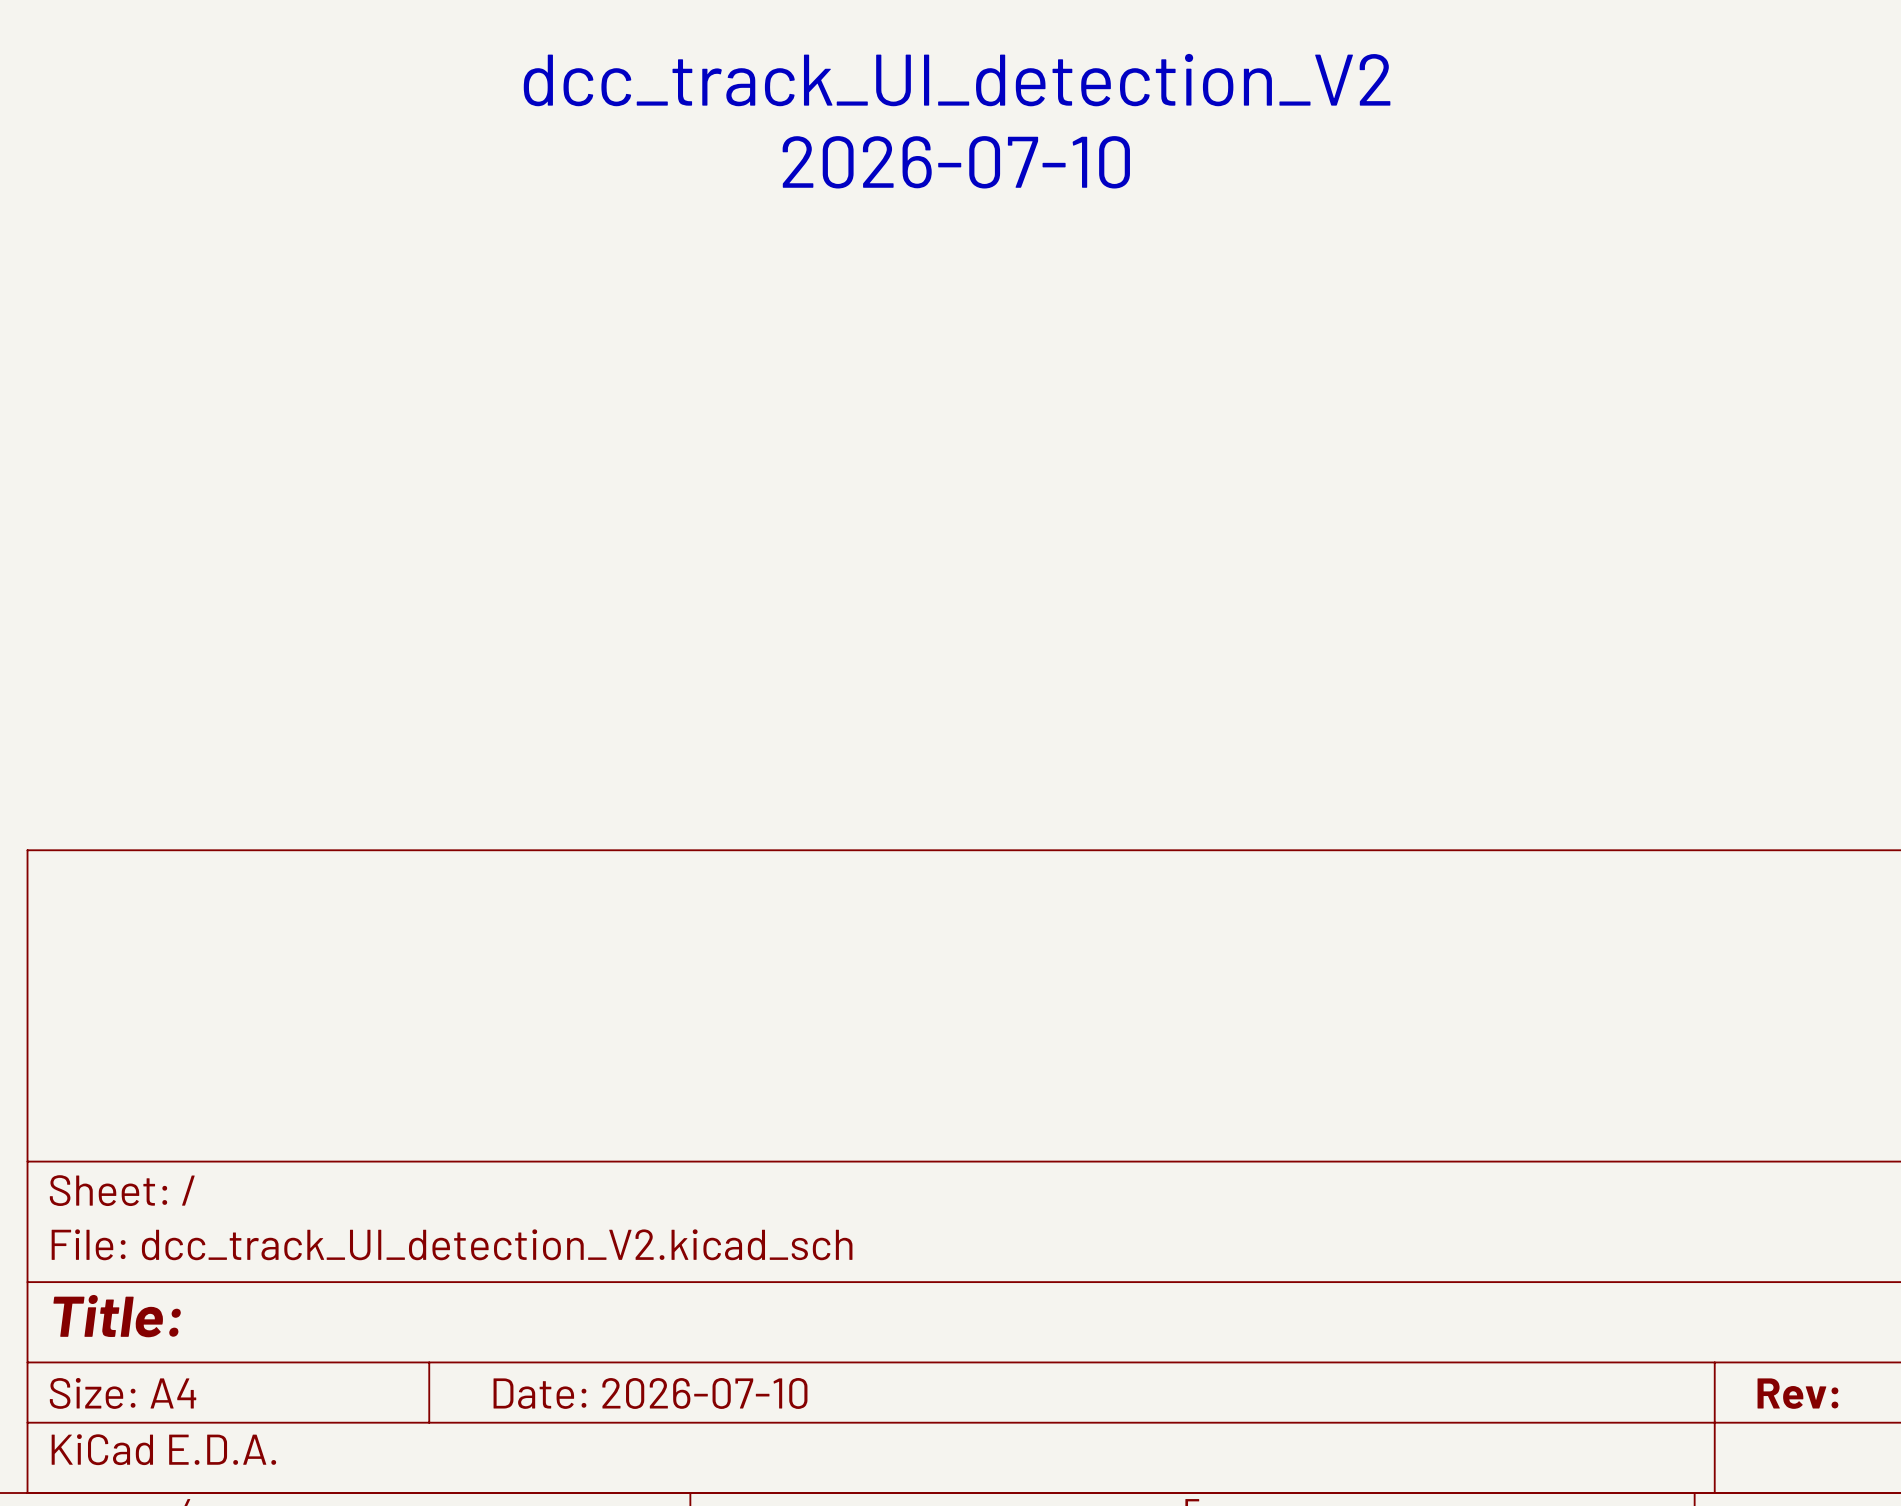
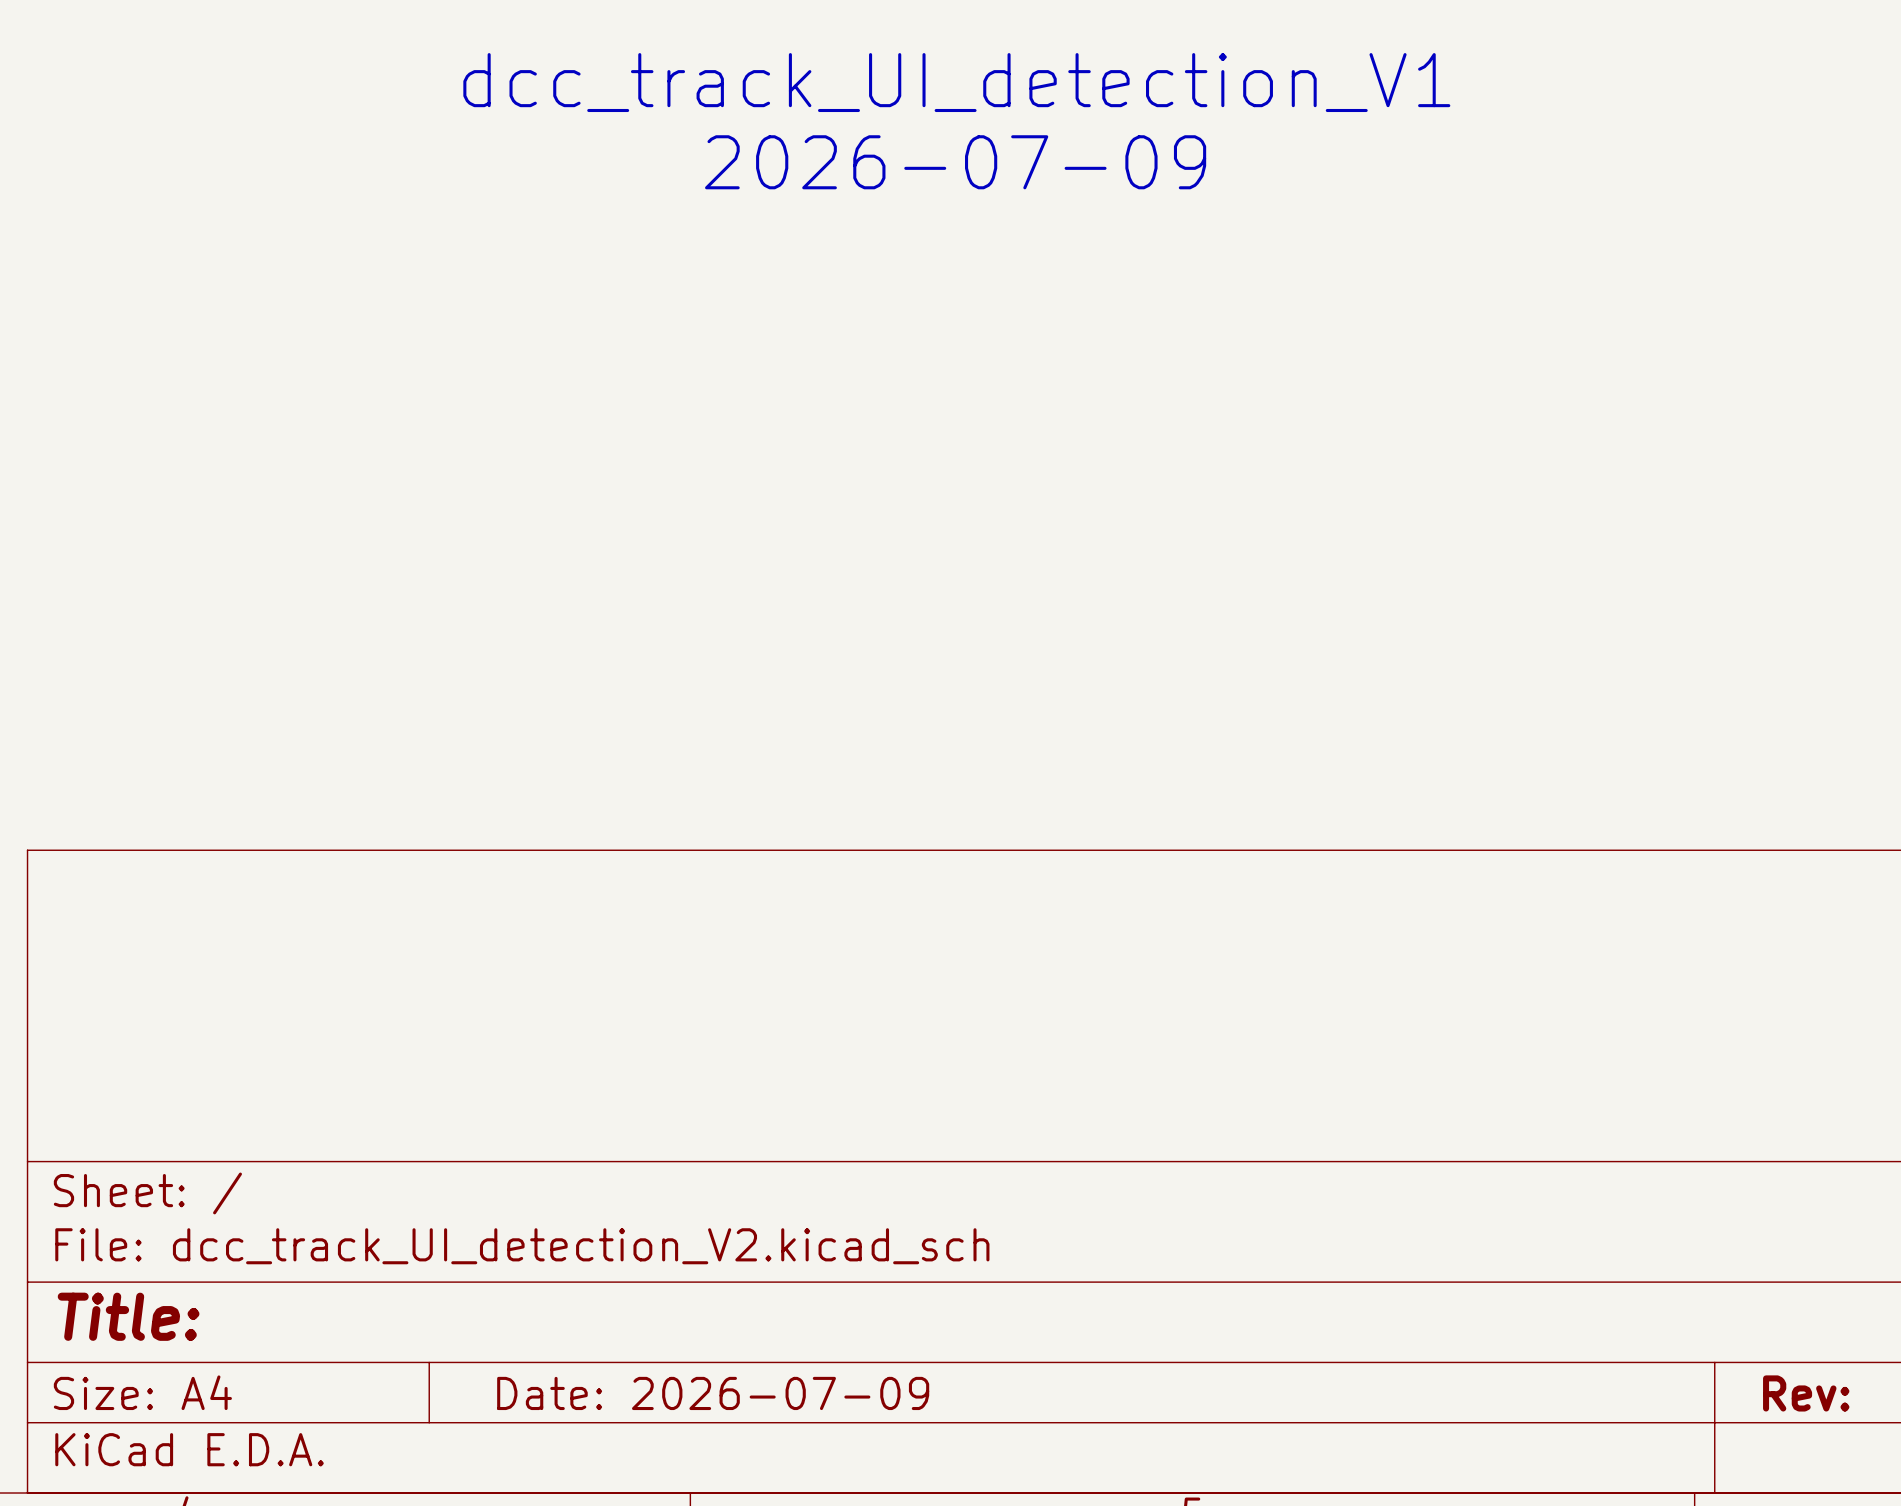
text: dcc_track_UI_detection_V2 (957, 80) -> dcc_track_UI_detection_V1 (956, 82)
text: 2026-07-10 (956, 162) -> 2026-07-09 (955, 162)
title block: Date: 2026-07-10 (650, 1393) -> Date: 2026-07-09 (713, 1393)

